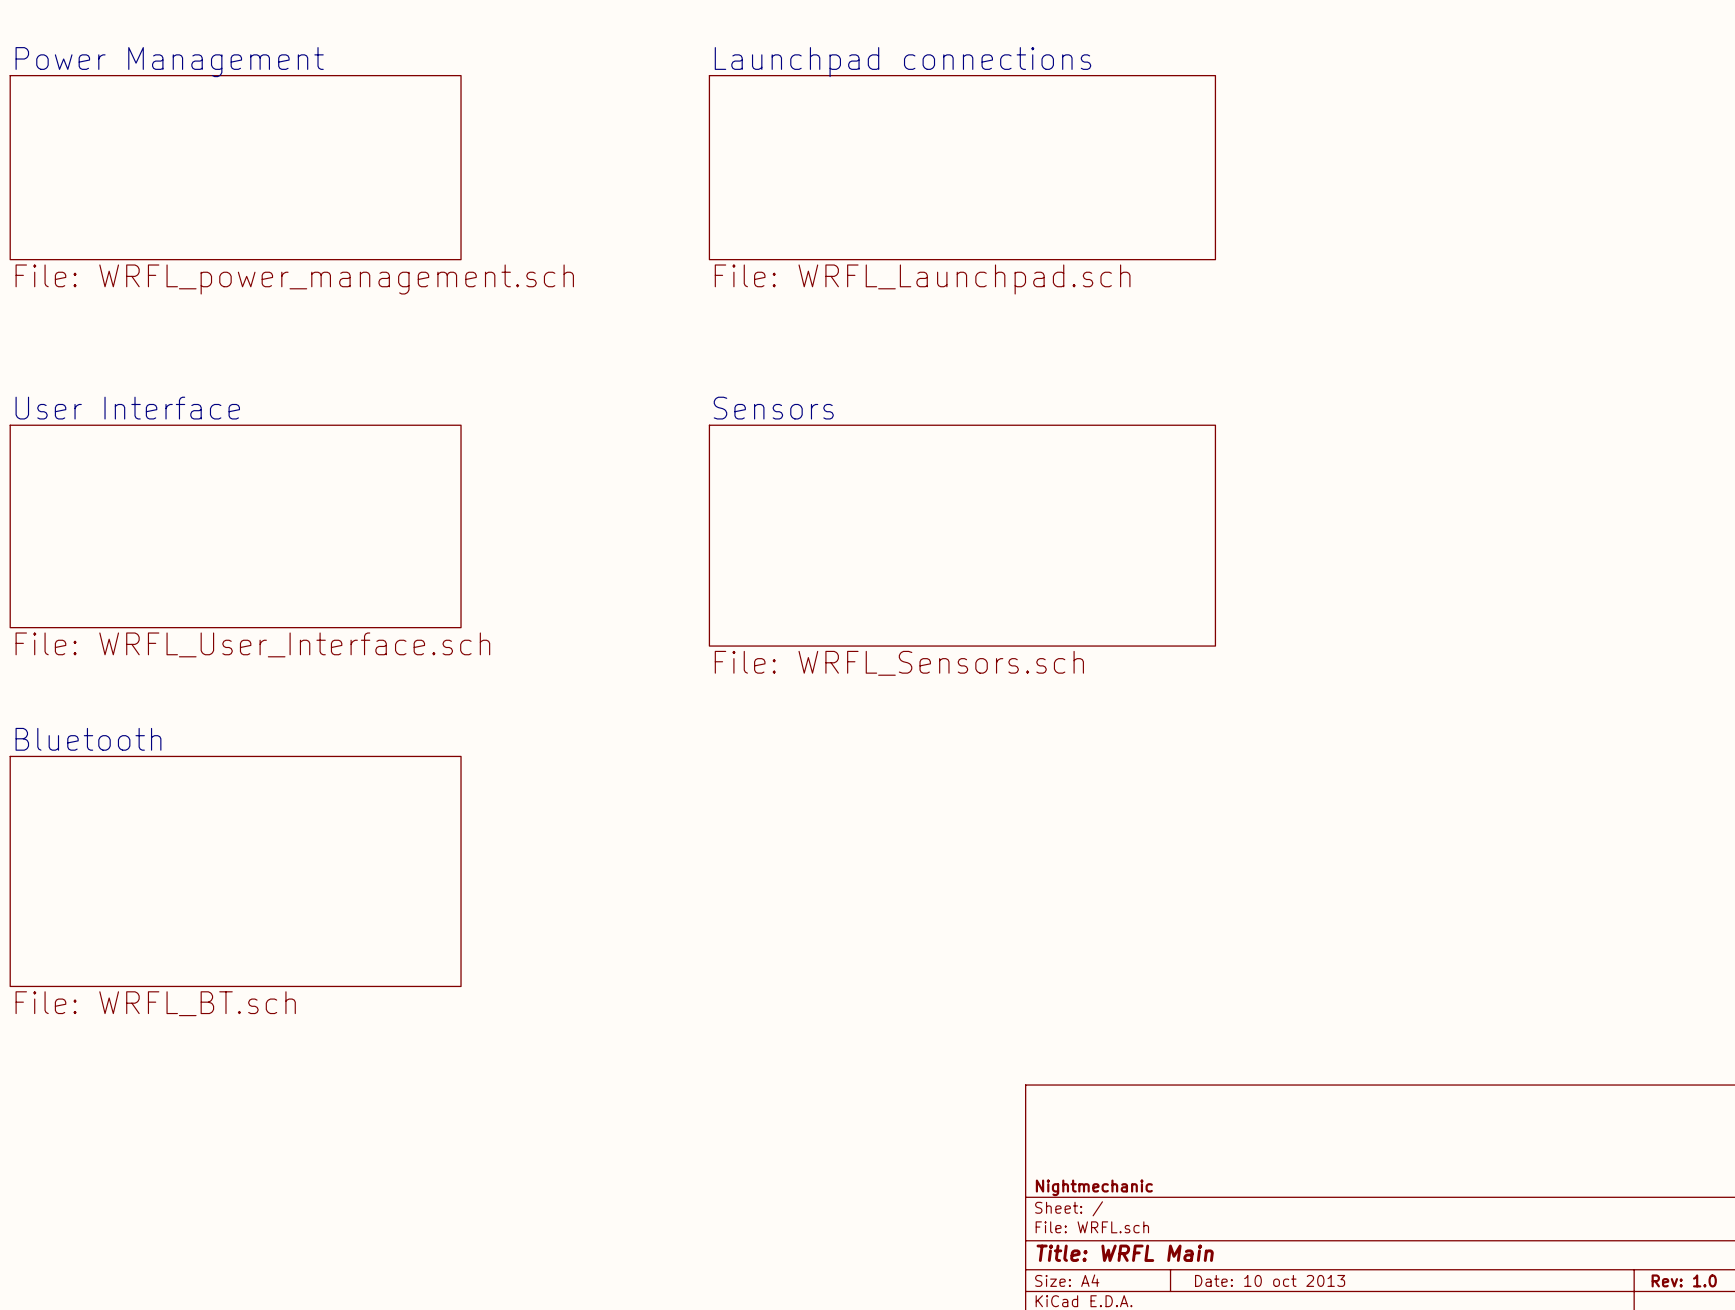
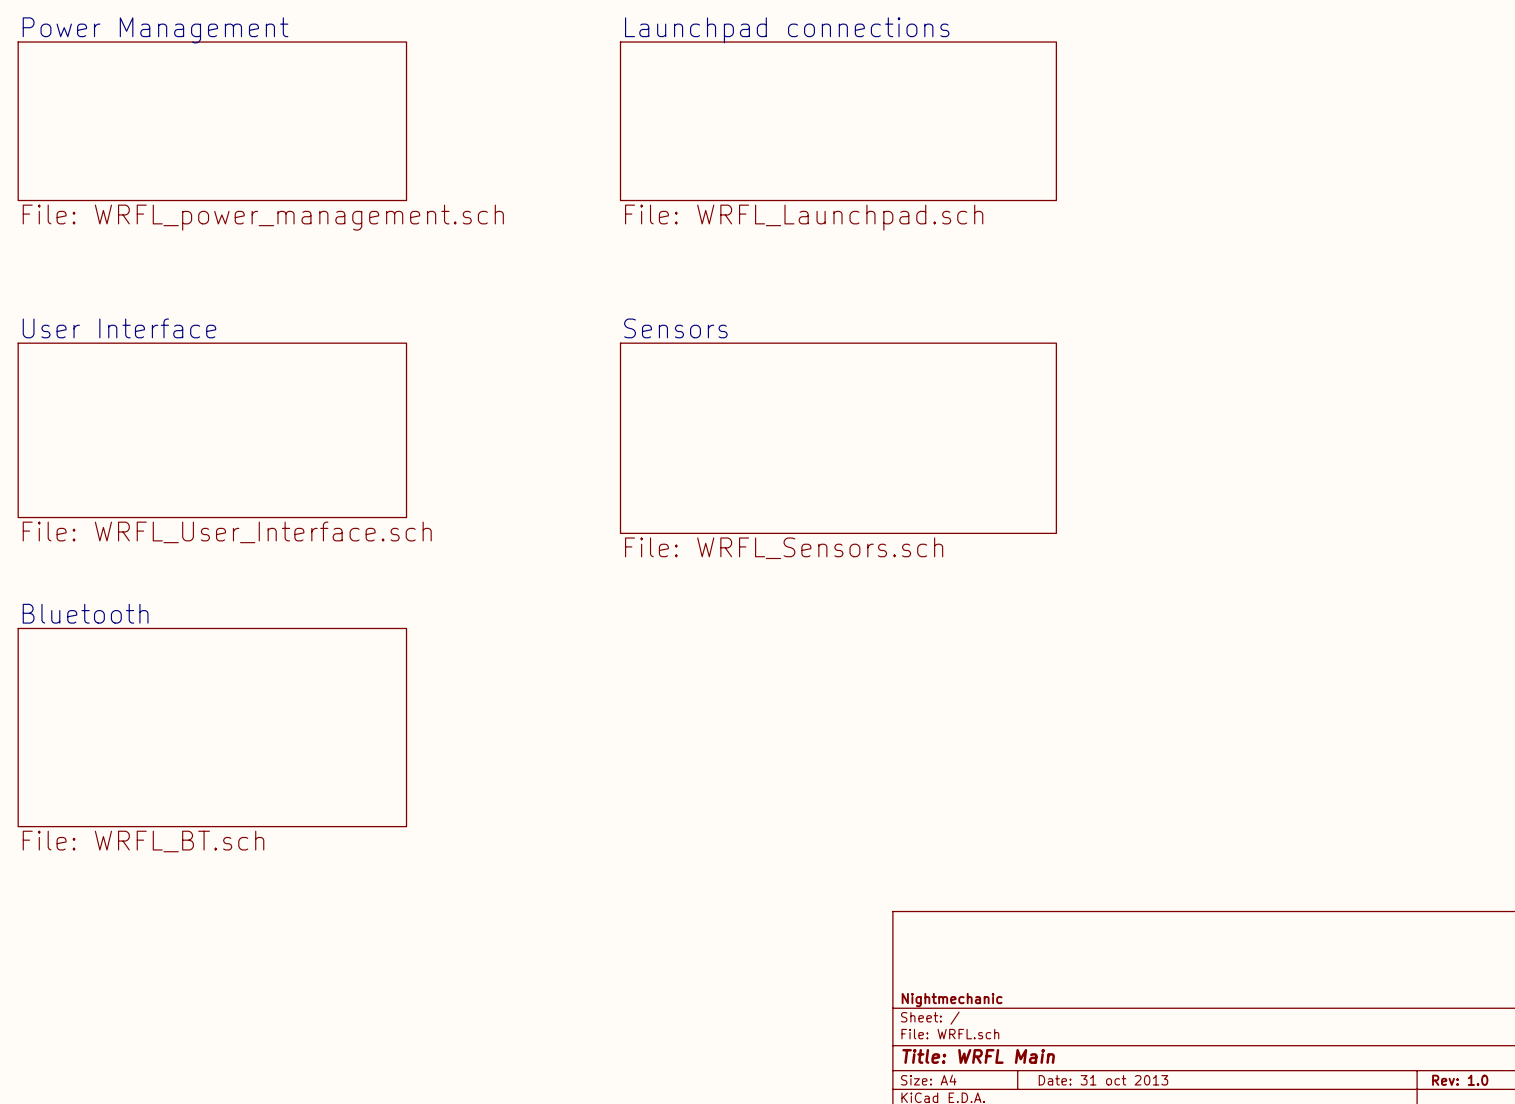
title block: Date: 10 oct 2013 (1270, 1280) -> Date: 31 oct 2013 (1103, 1080)

